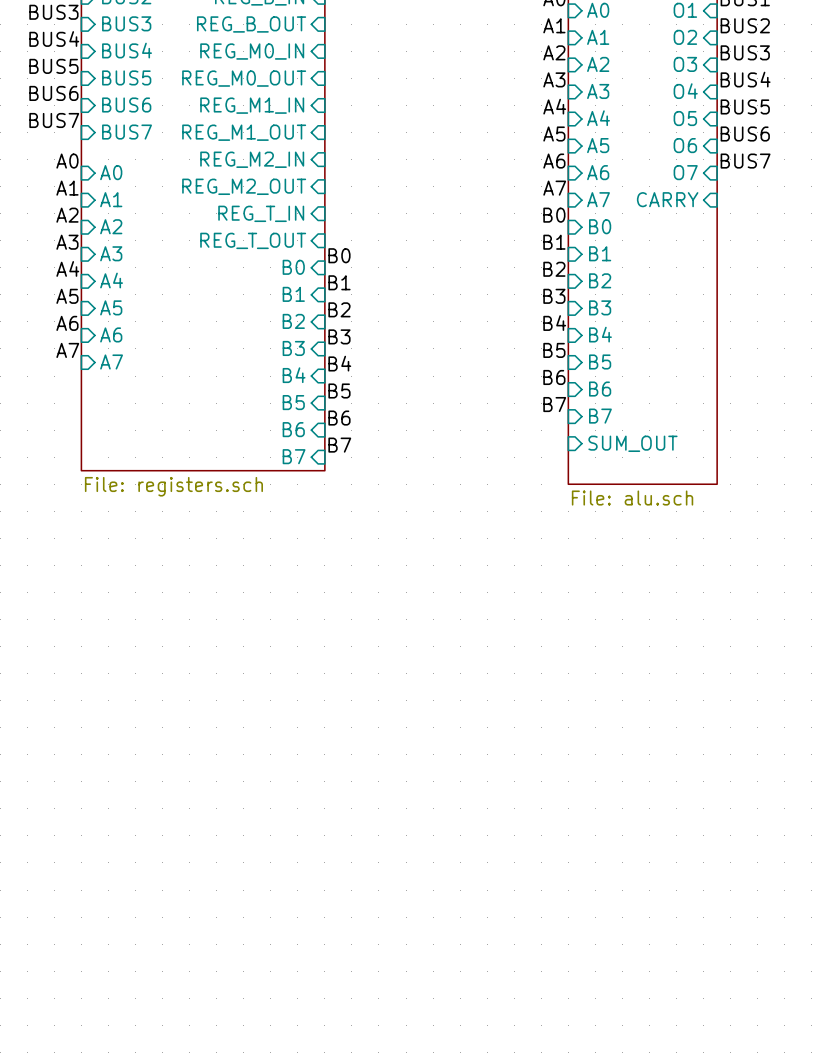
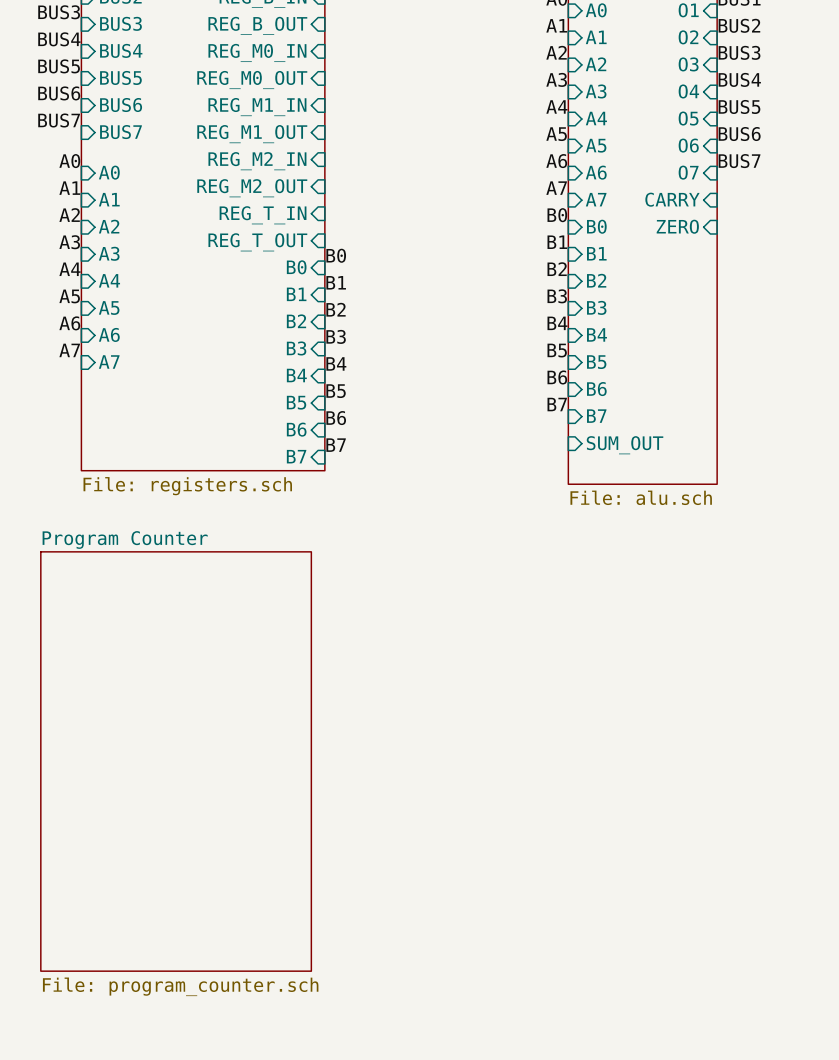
sheet pin: none -> ZERO (677, 226)
sheet Program Counter: none -> File: program_counter.sch (176, 761)

